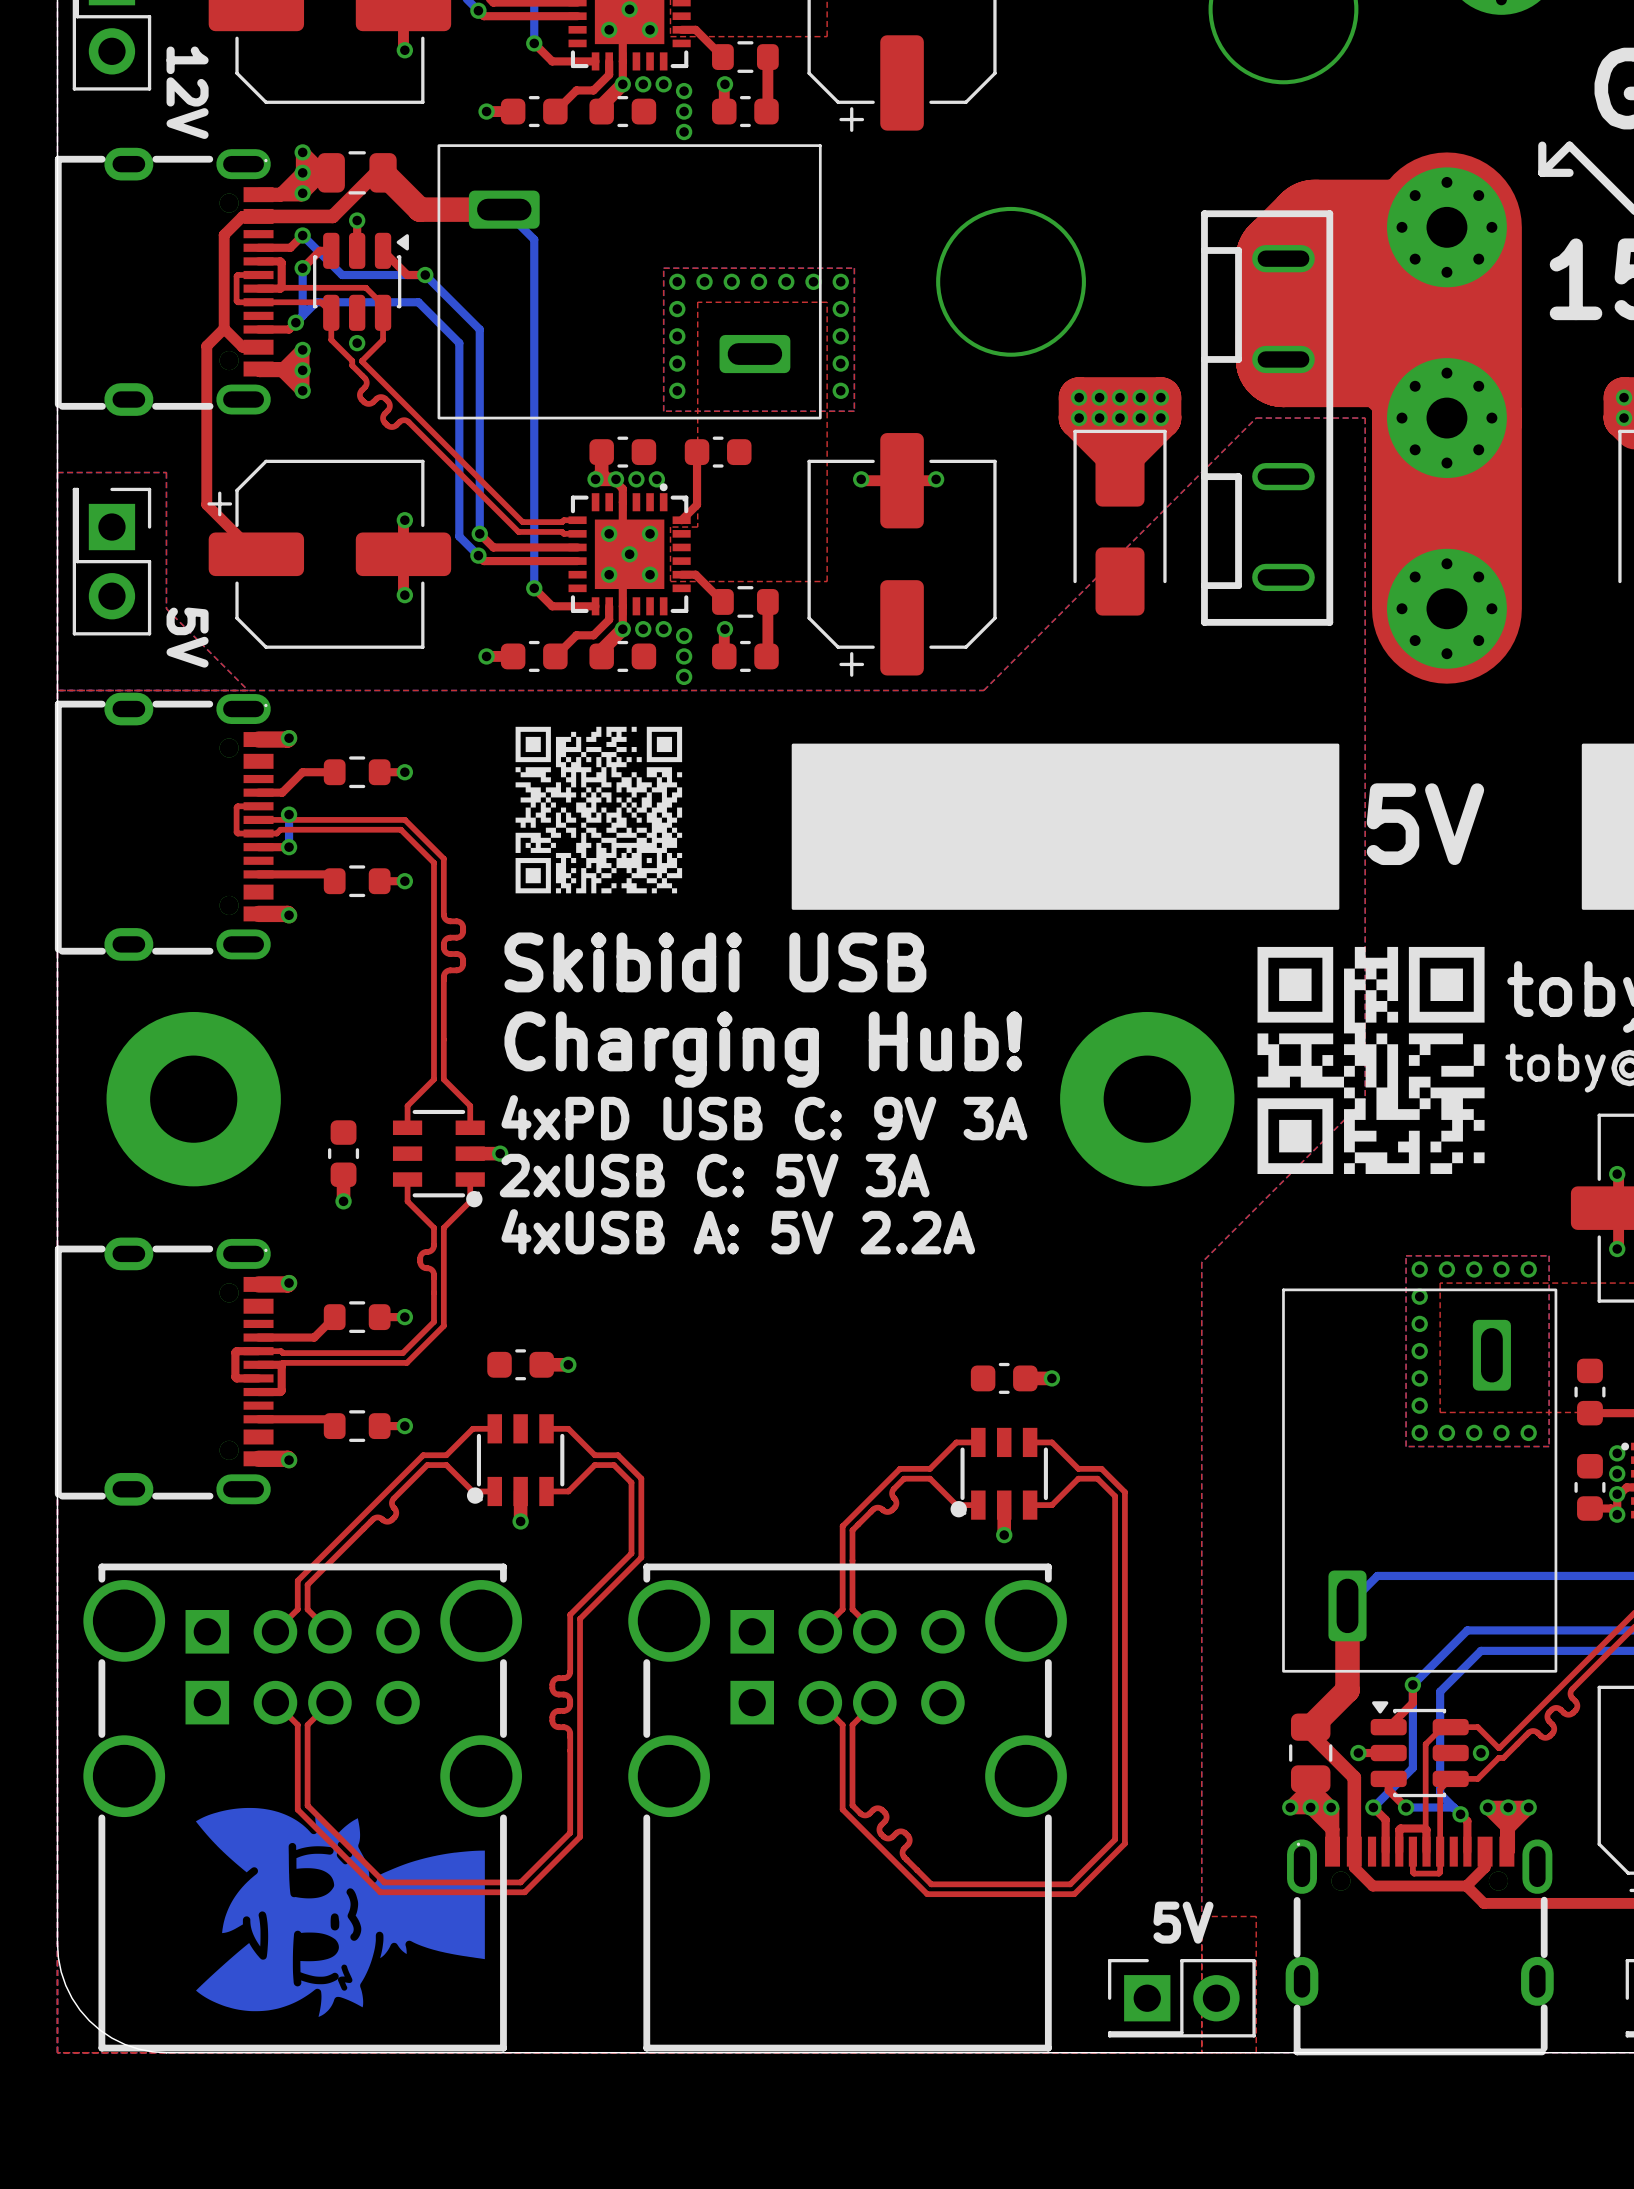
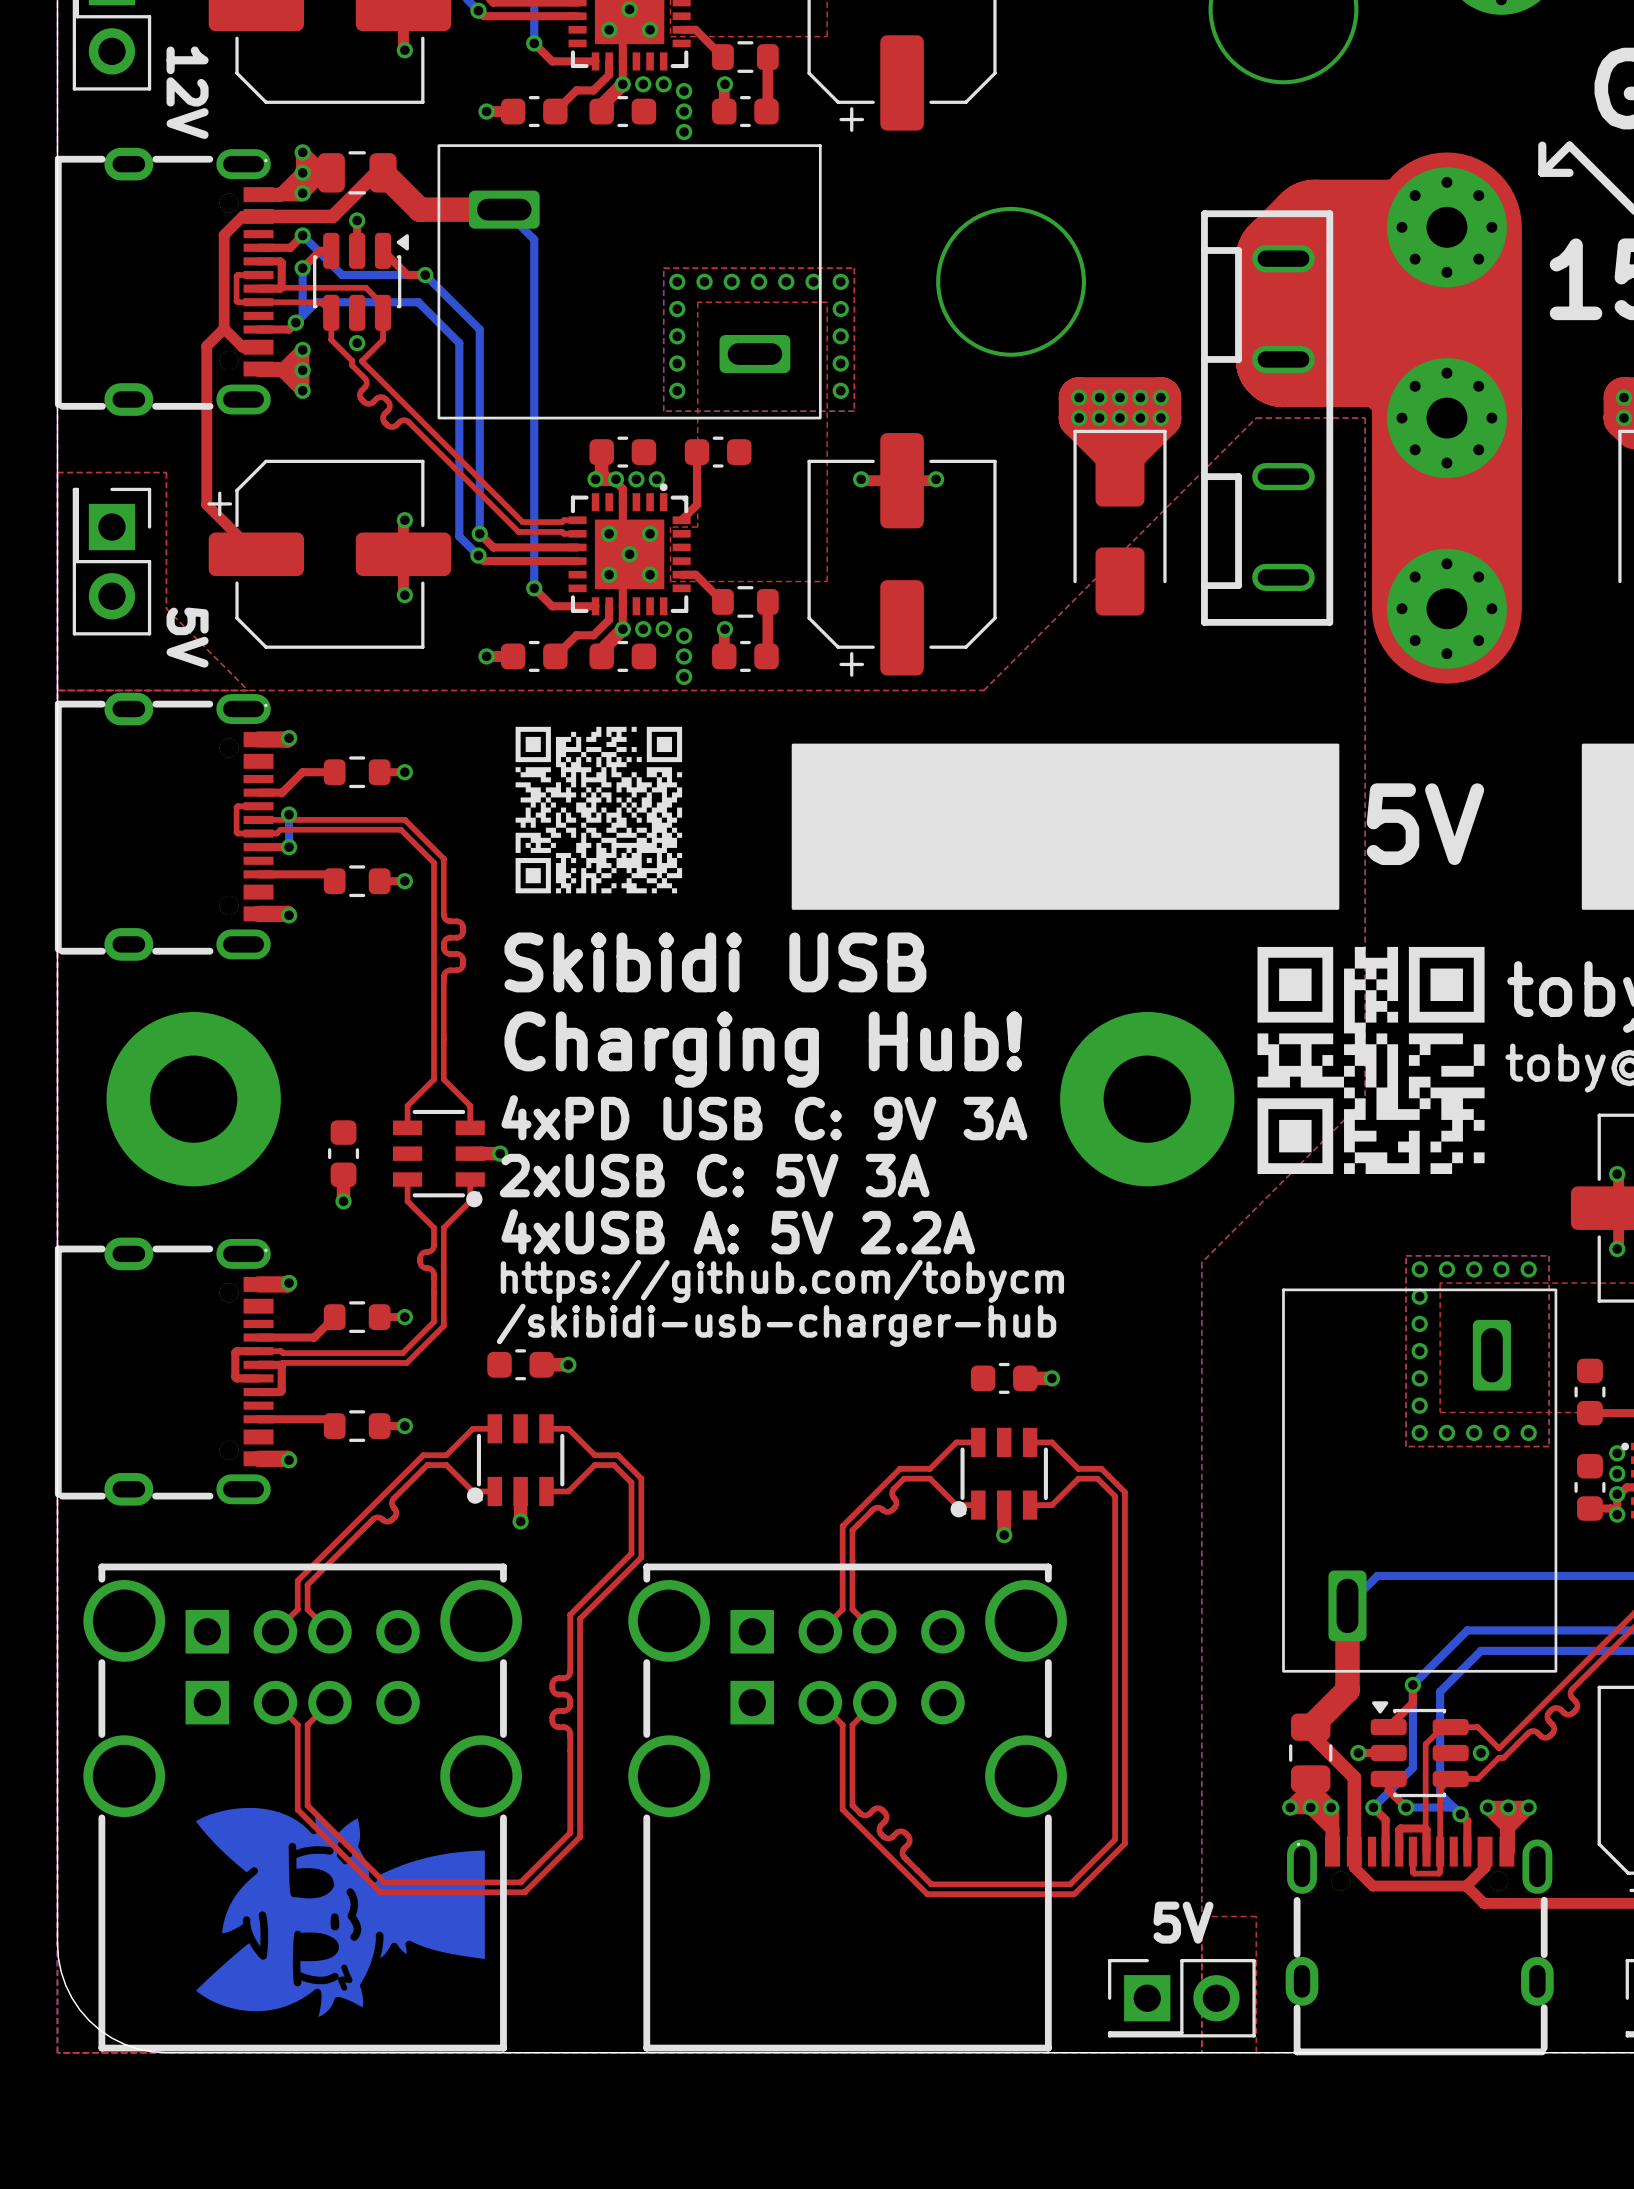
text: none -> https://github.com/tobycm (782, 1281)
text: none -> /skibidi-usb-charger-hub (776, 1325)

